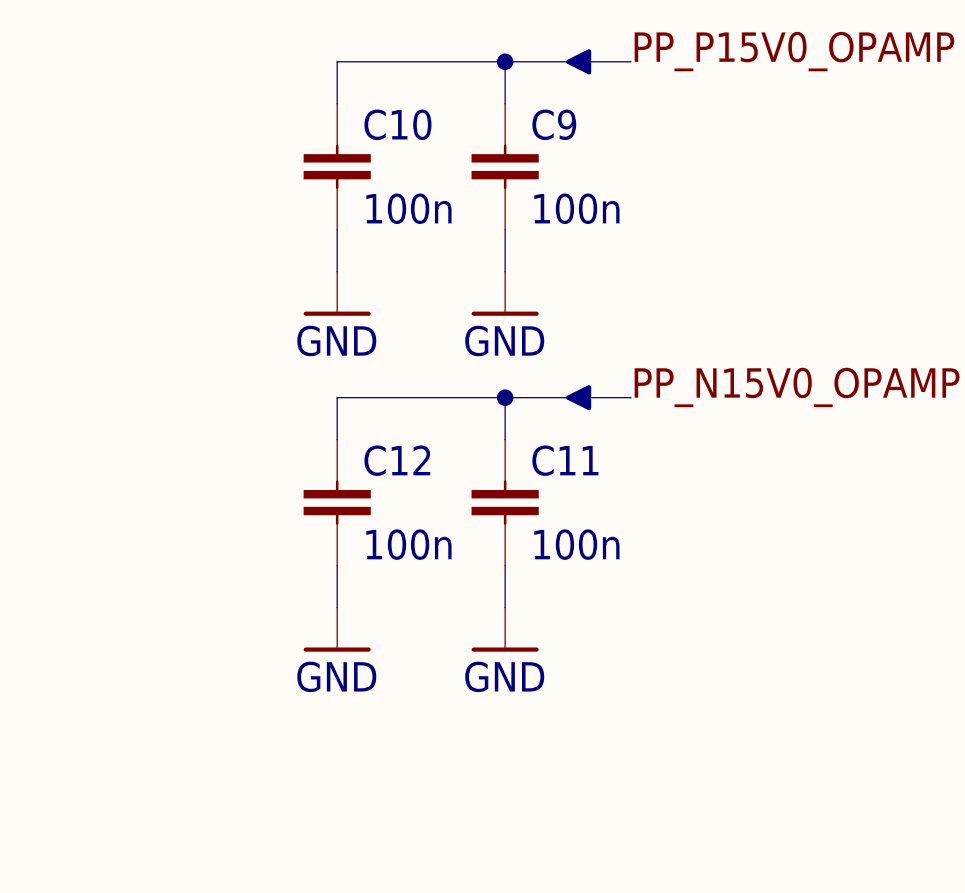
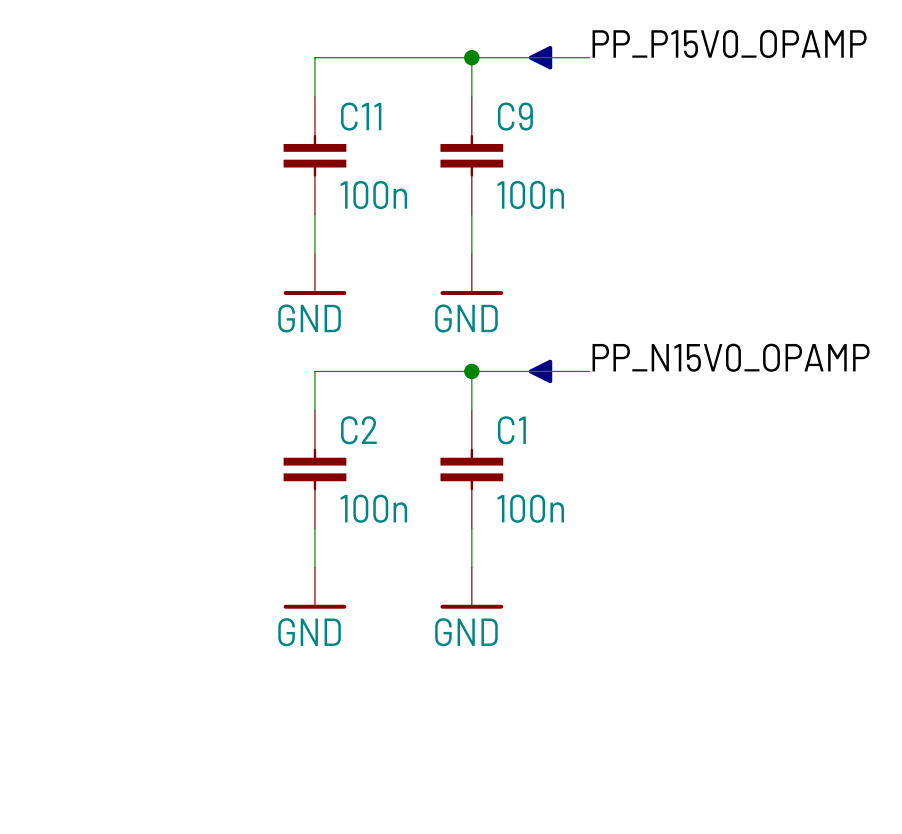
C10 name: C10 (397, 124) -> C11 (361, 116)
C12 name: C12 (397, 460) -> C2 (358, 430)
C11 name: C11 (565, 460) -> C1 (511, 430)

